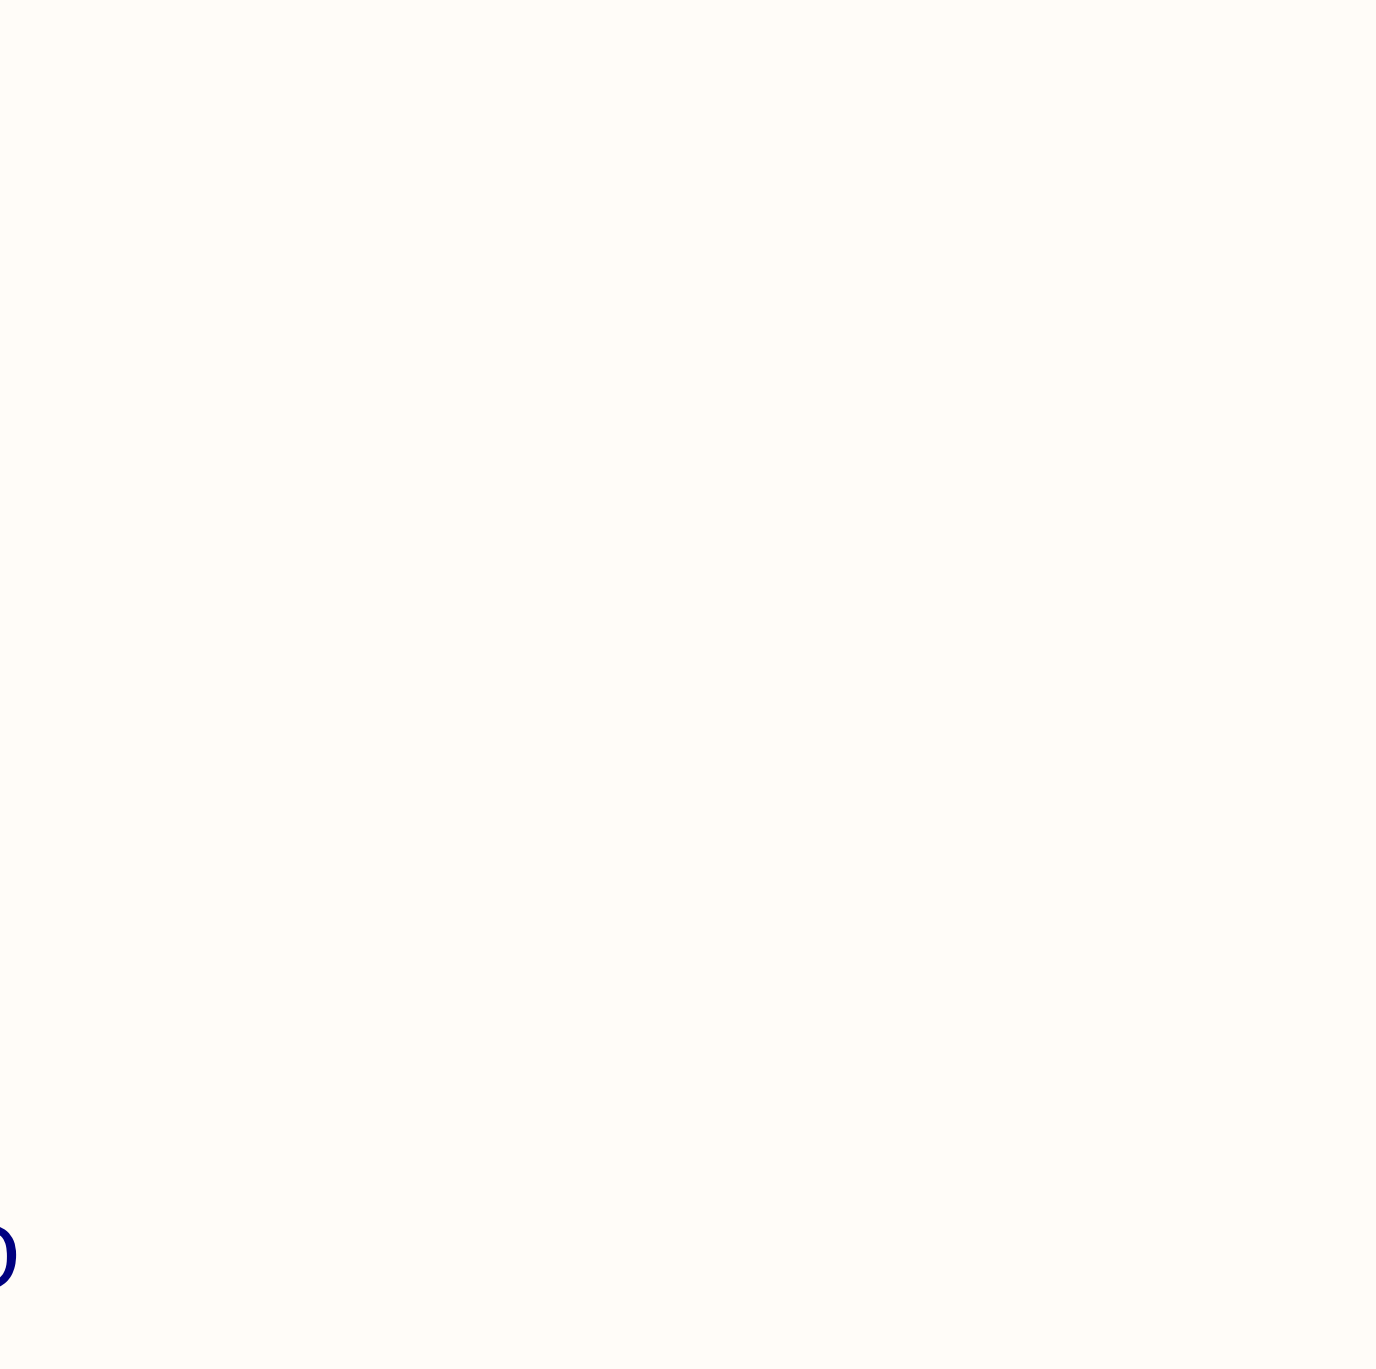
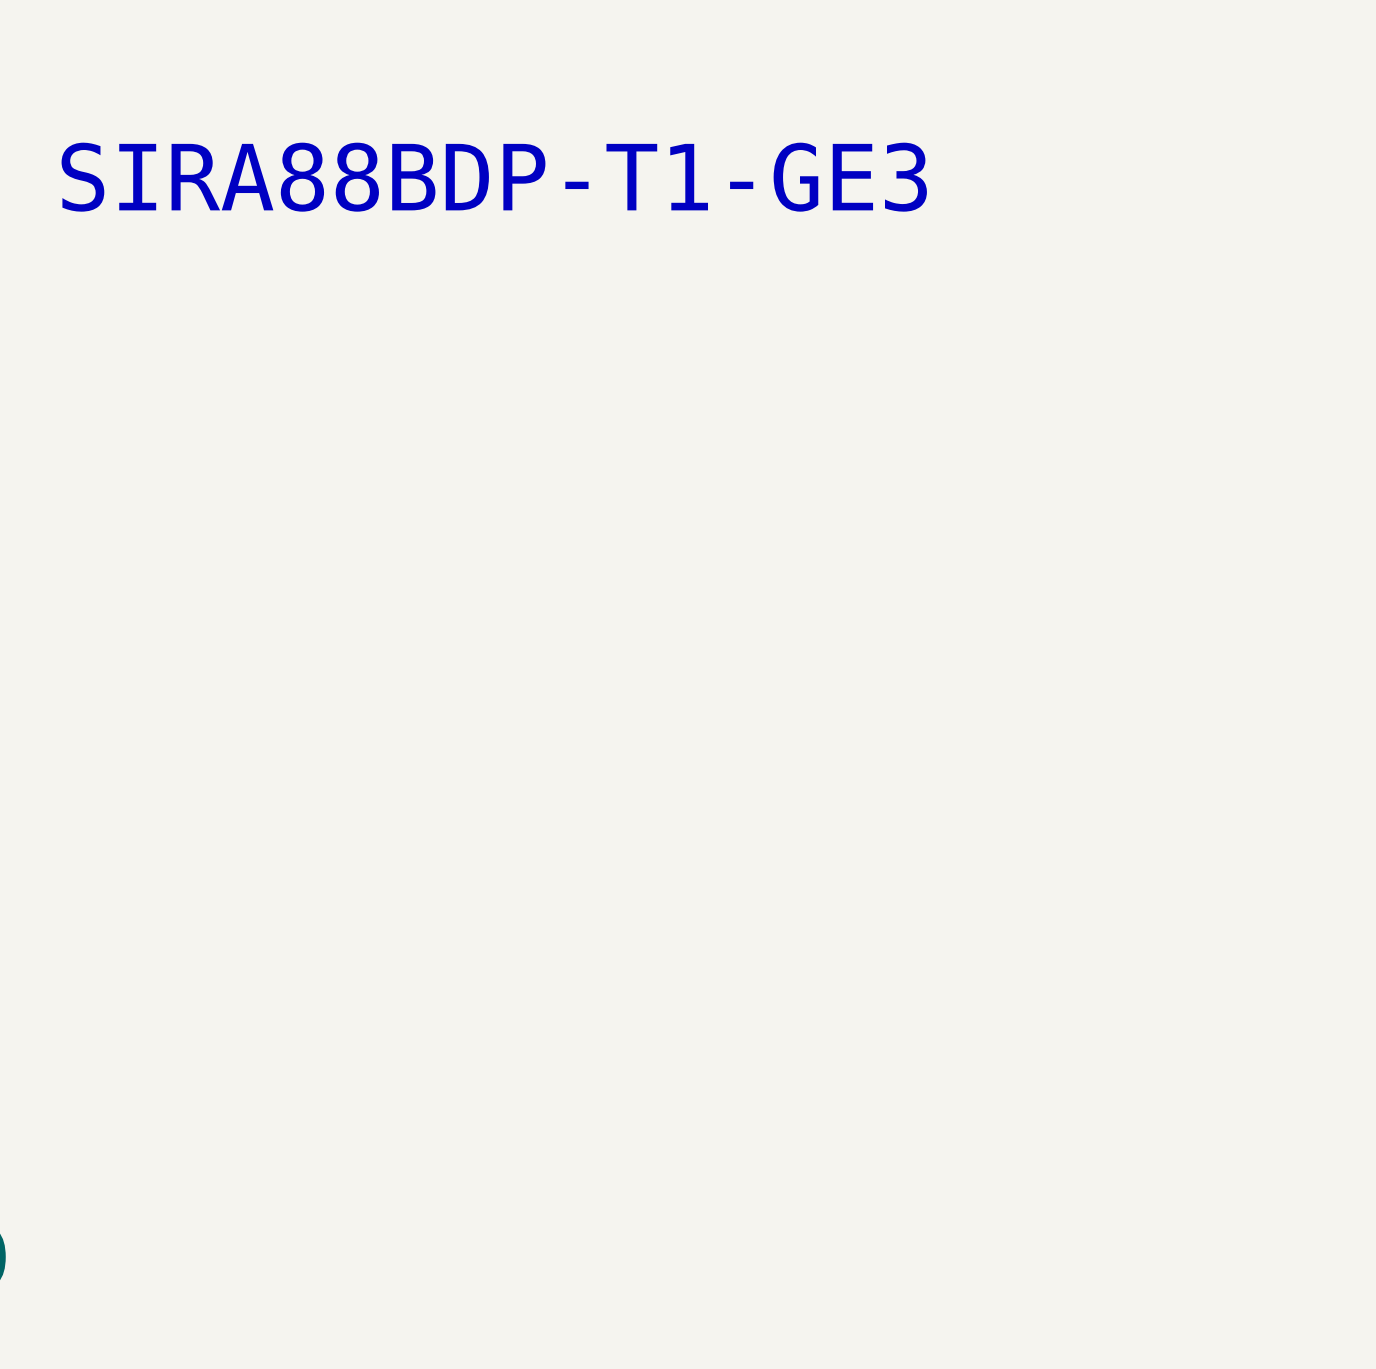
text: none -> SIRA88BDP-T1-GE3 (494, 177)

